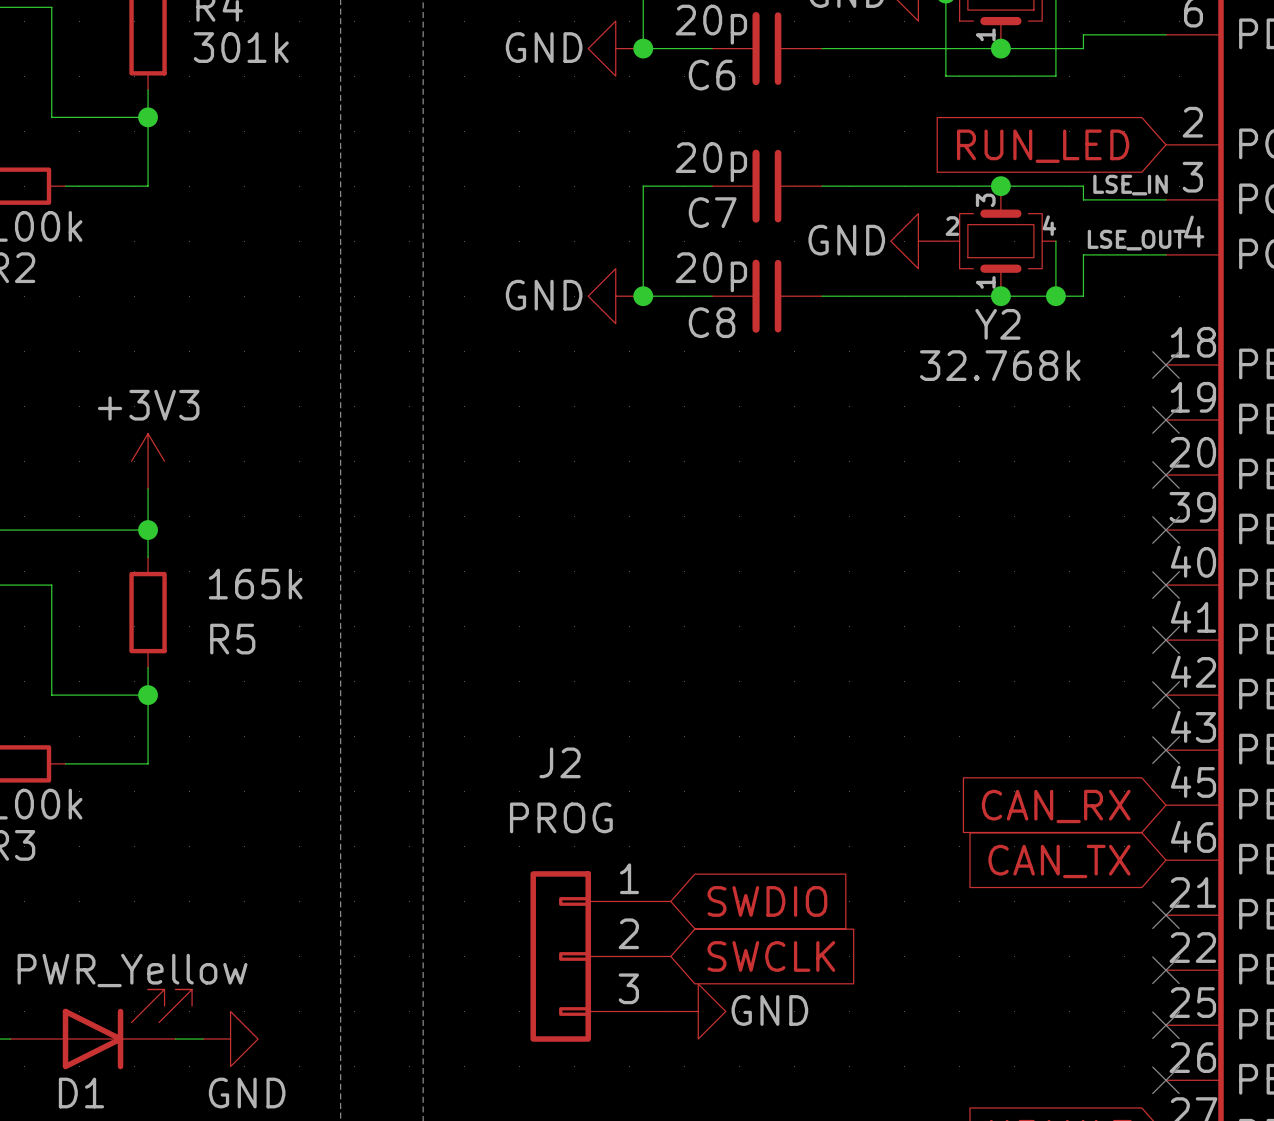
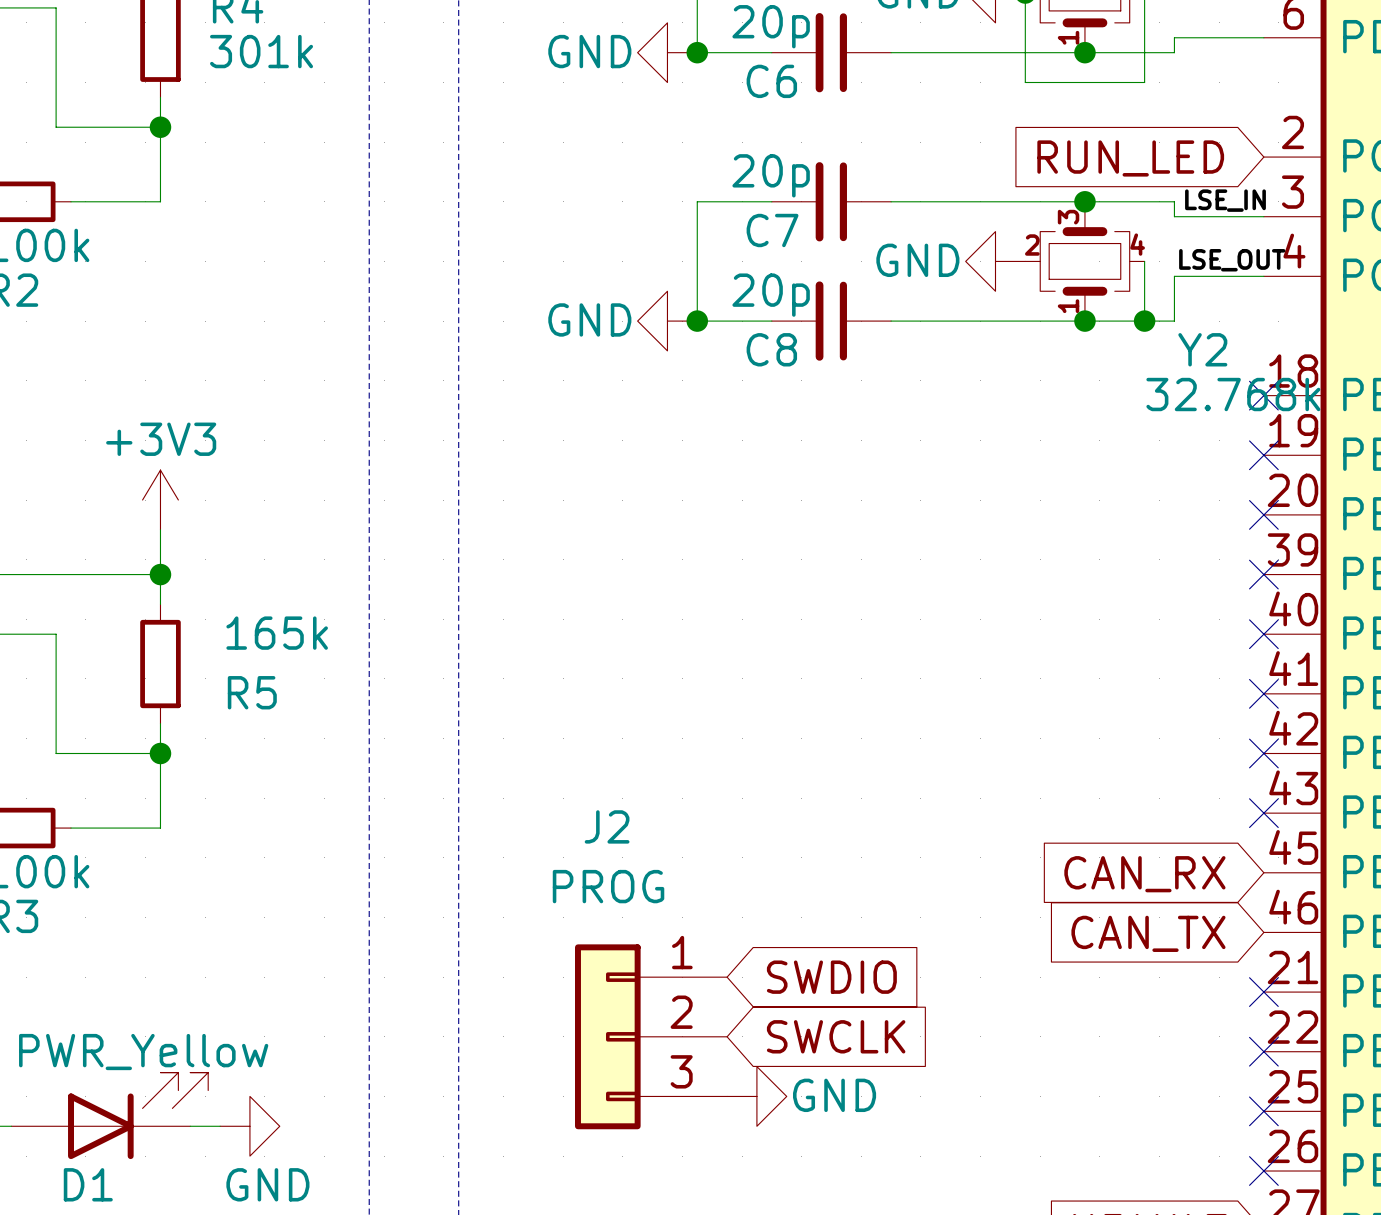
Y2 name position: Y2 (997, 324) -> Y2 (1202, 349)
Y2 value position: 32.768k (1000, 365) -> 32.768k (1233, 394)

